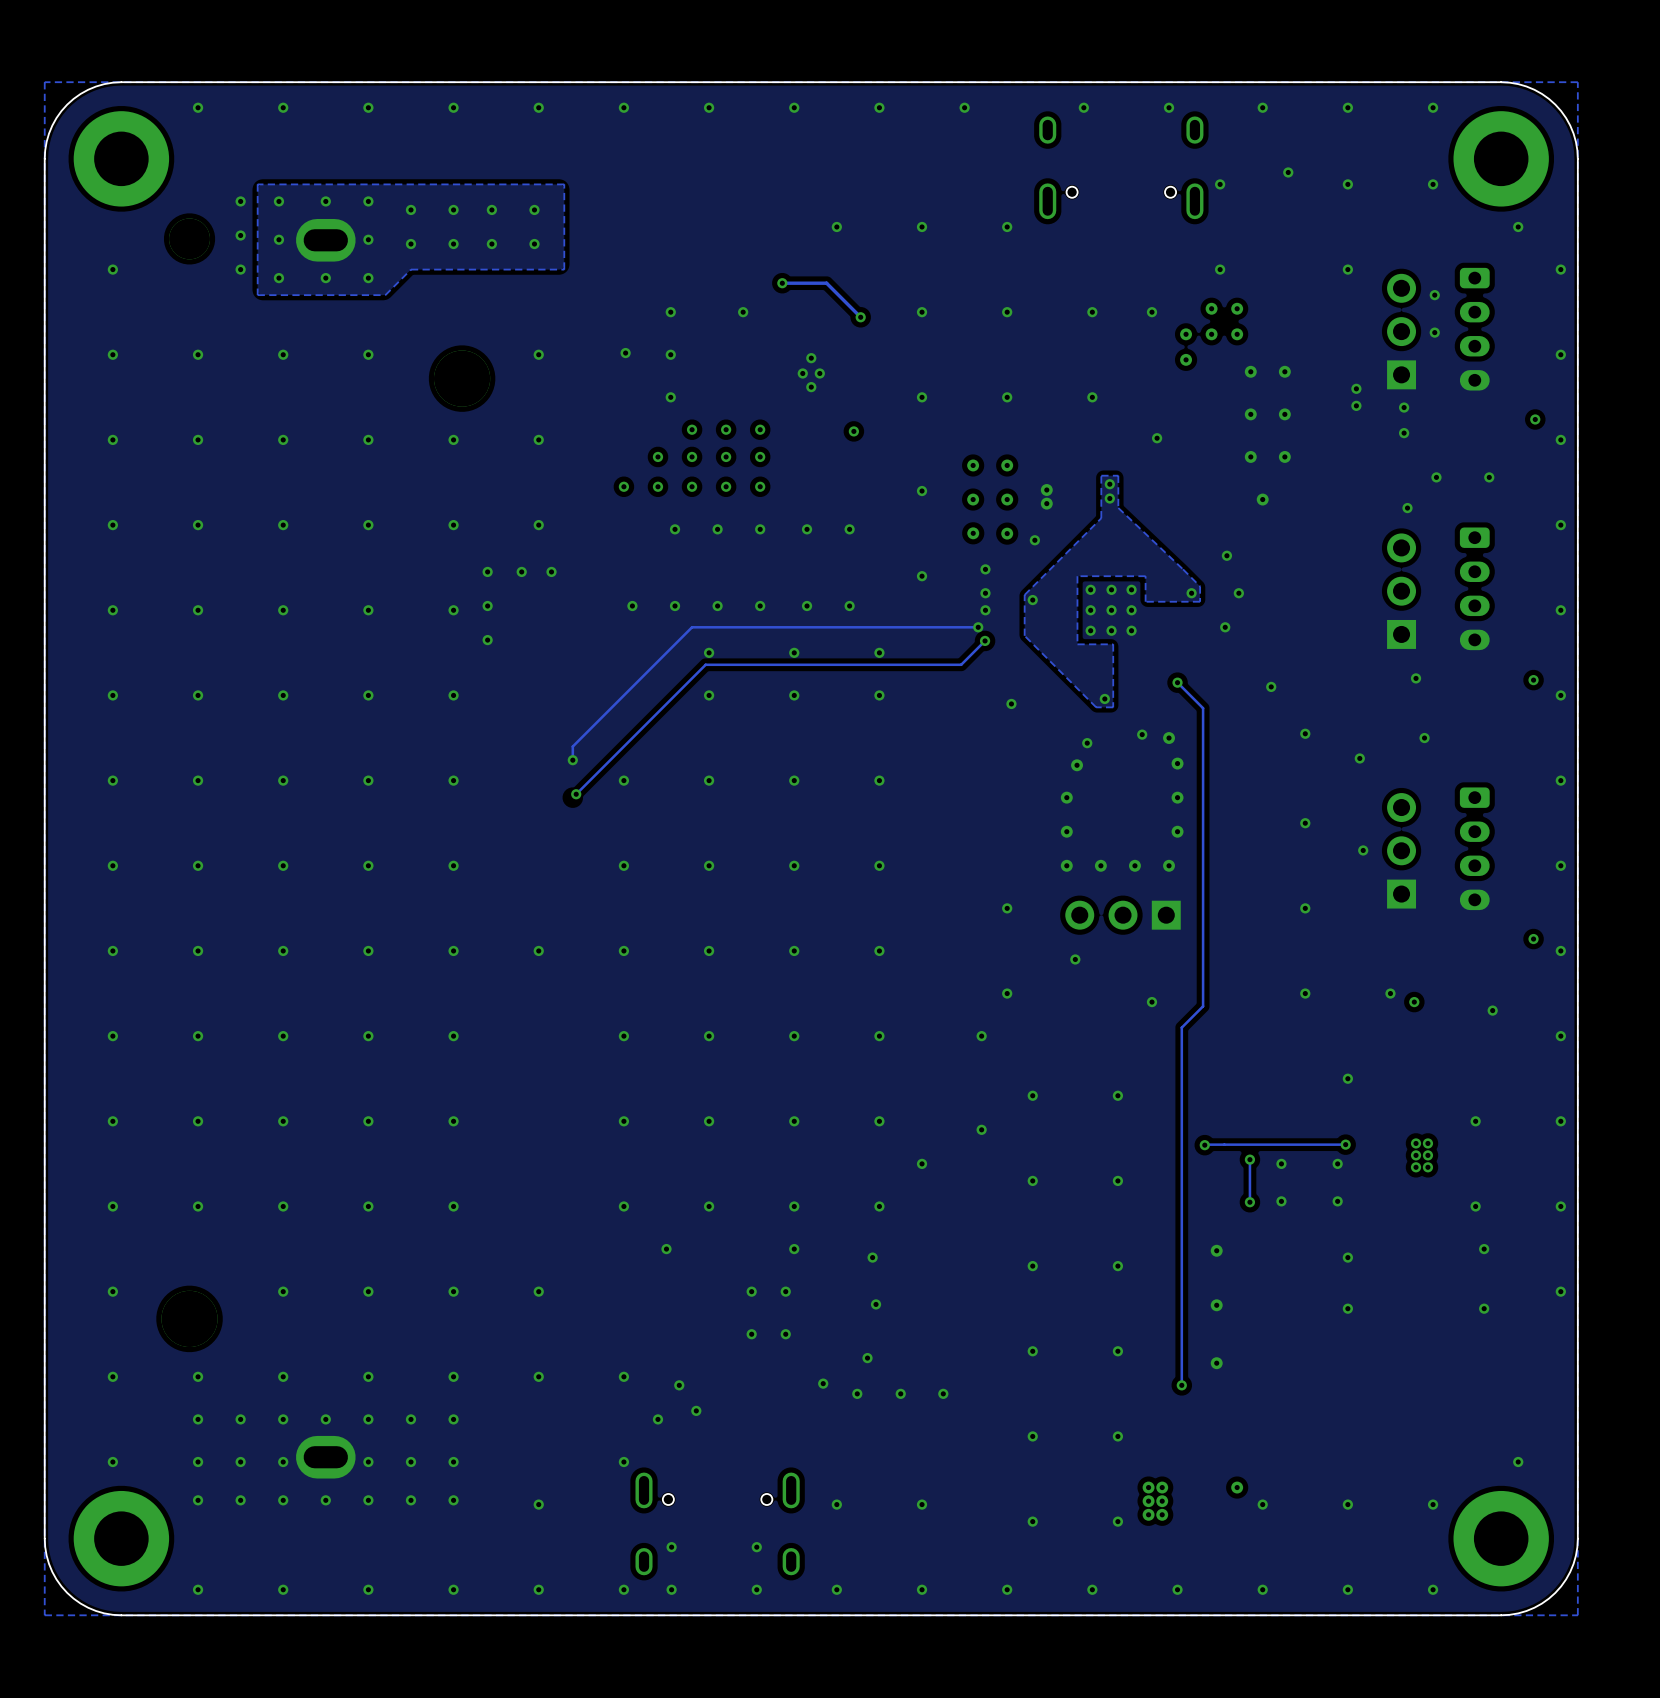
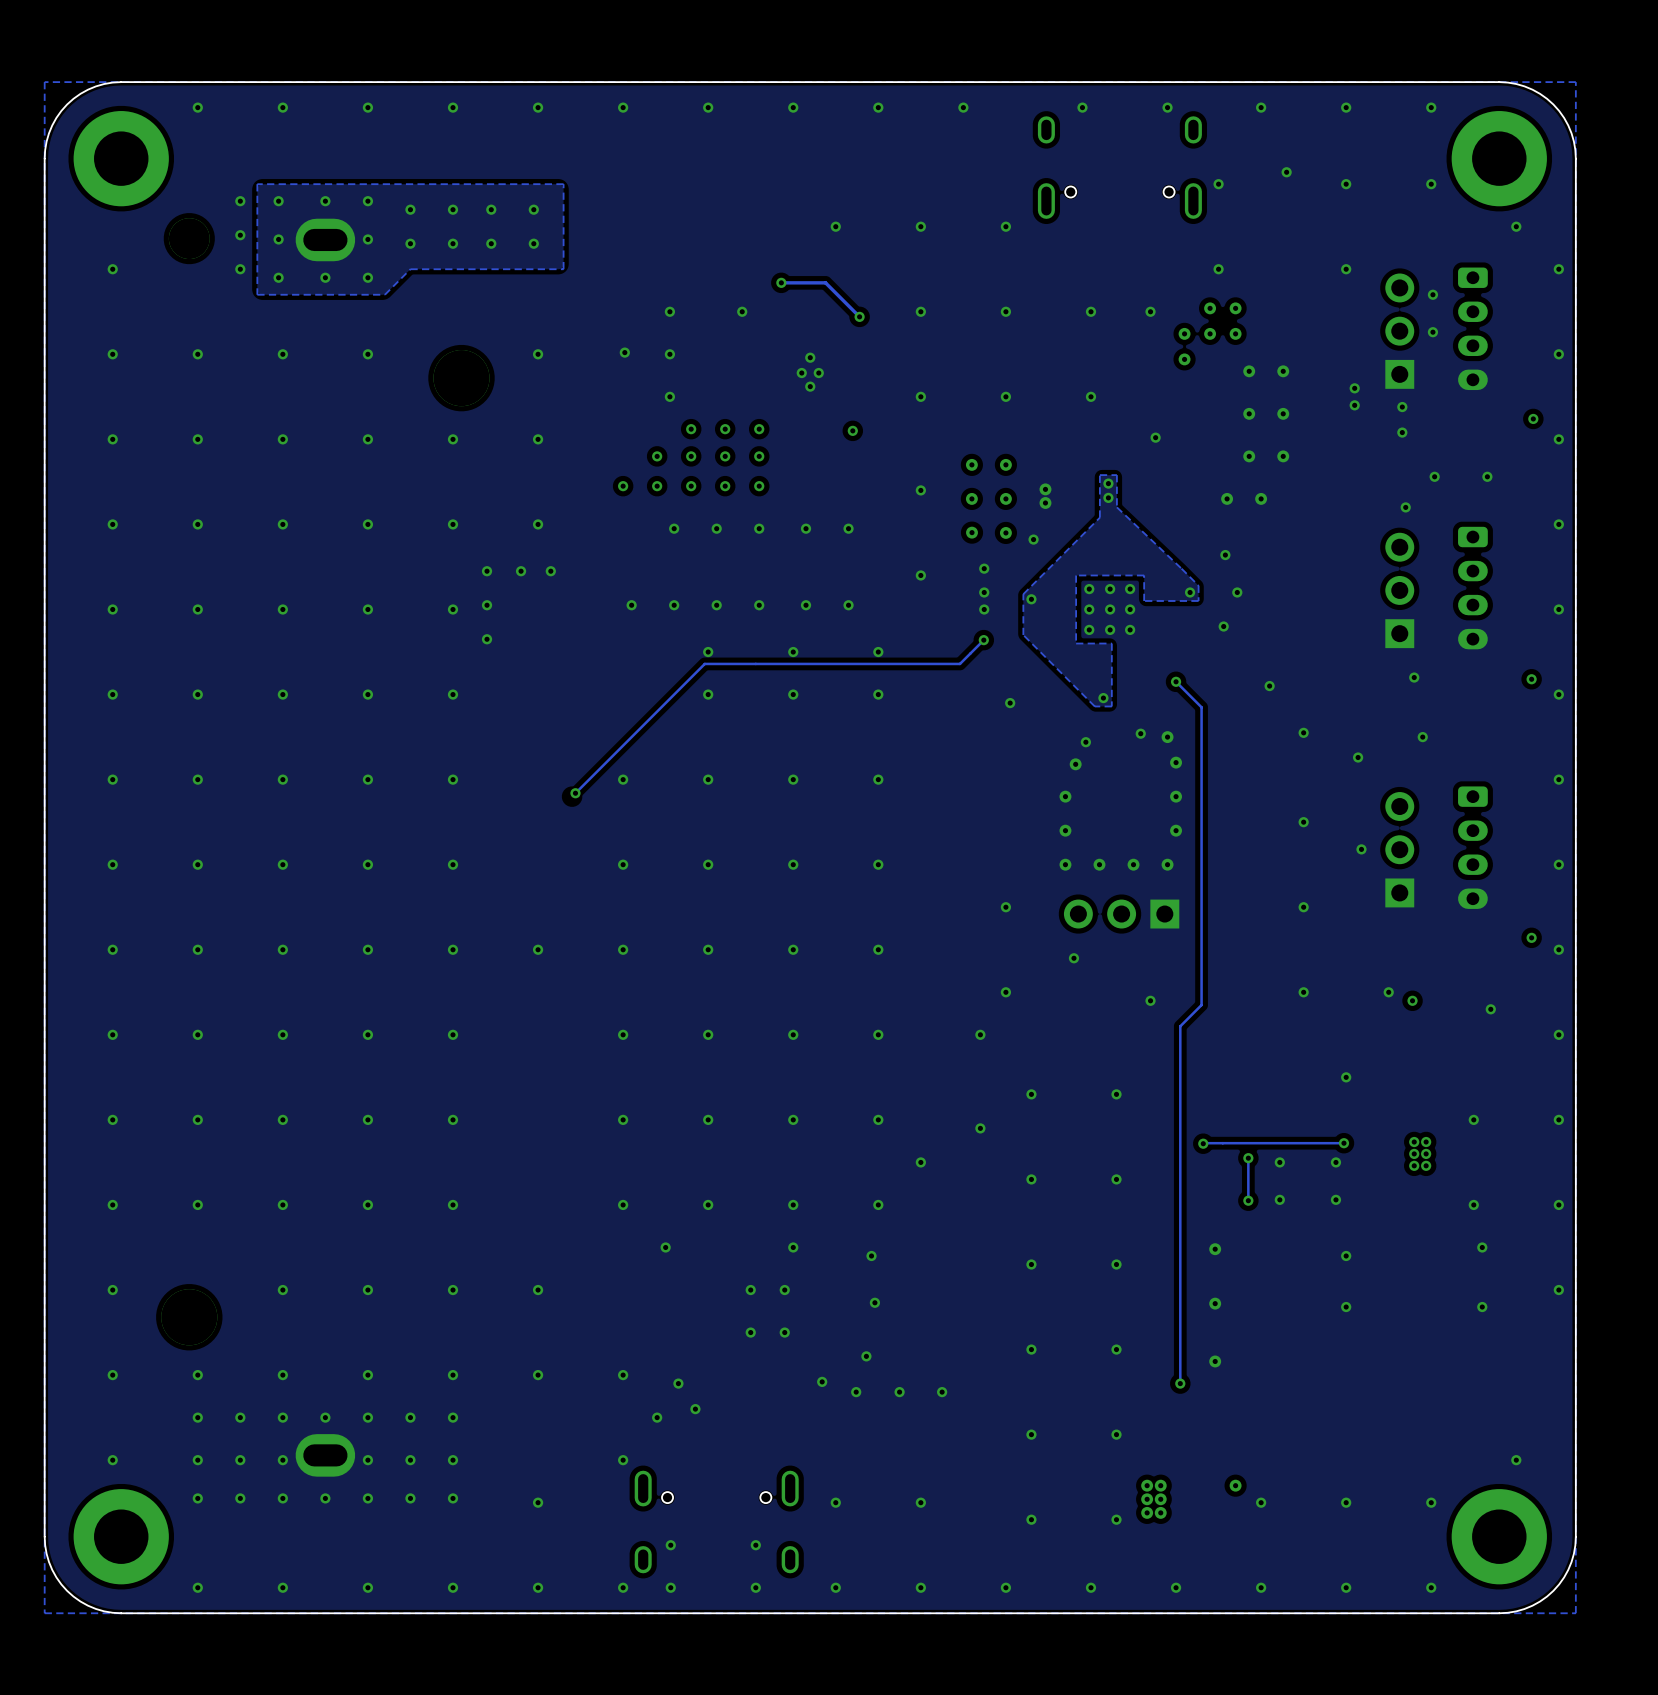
via: none -> (1227, 498)
track: (978, 627) (692, 627) (572, 746) (572, 760) -> none
via: (978, 627) -> none
via: (572, 760) -> none

